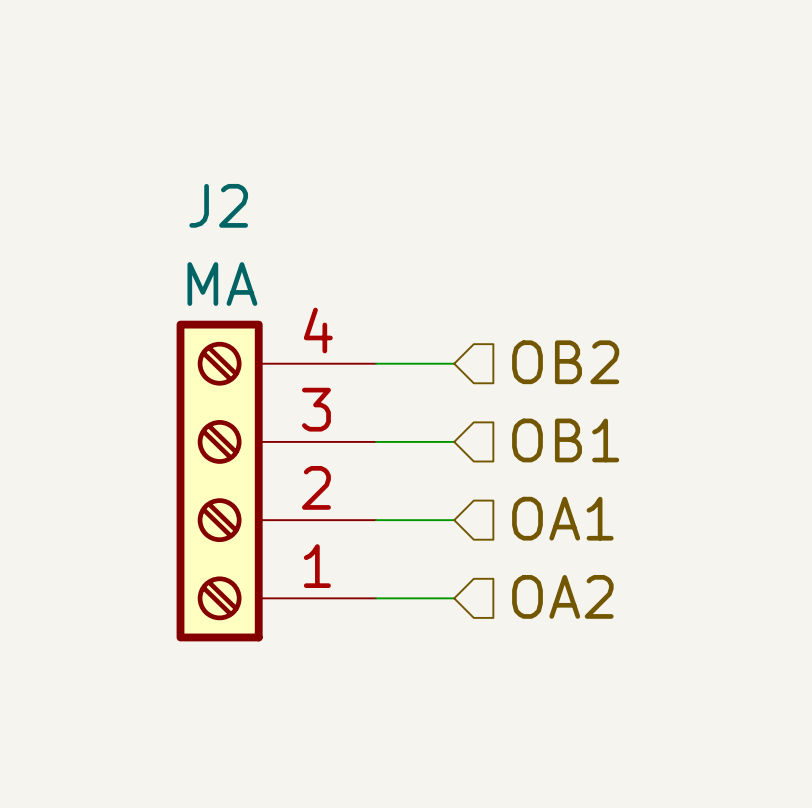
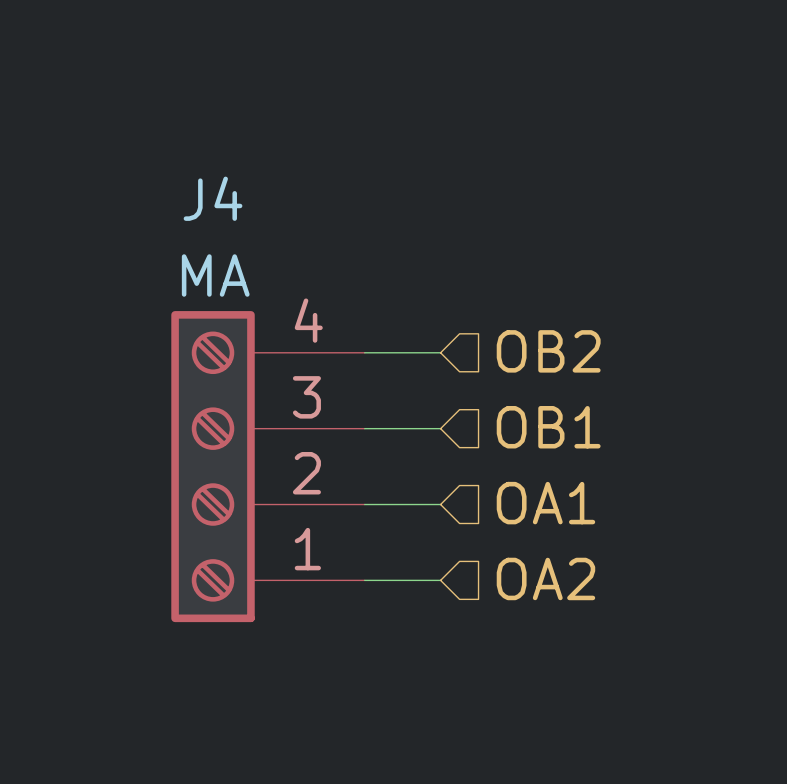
J2 name: J2 (218, 205) -> J4 (213, 198)

